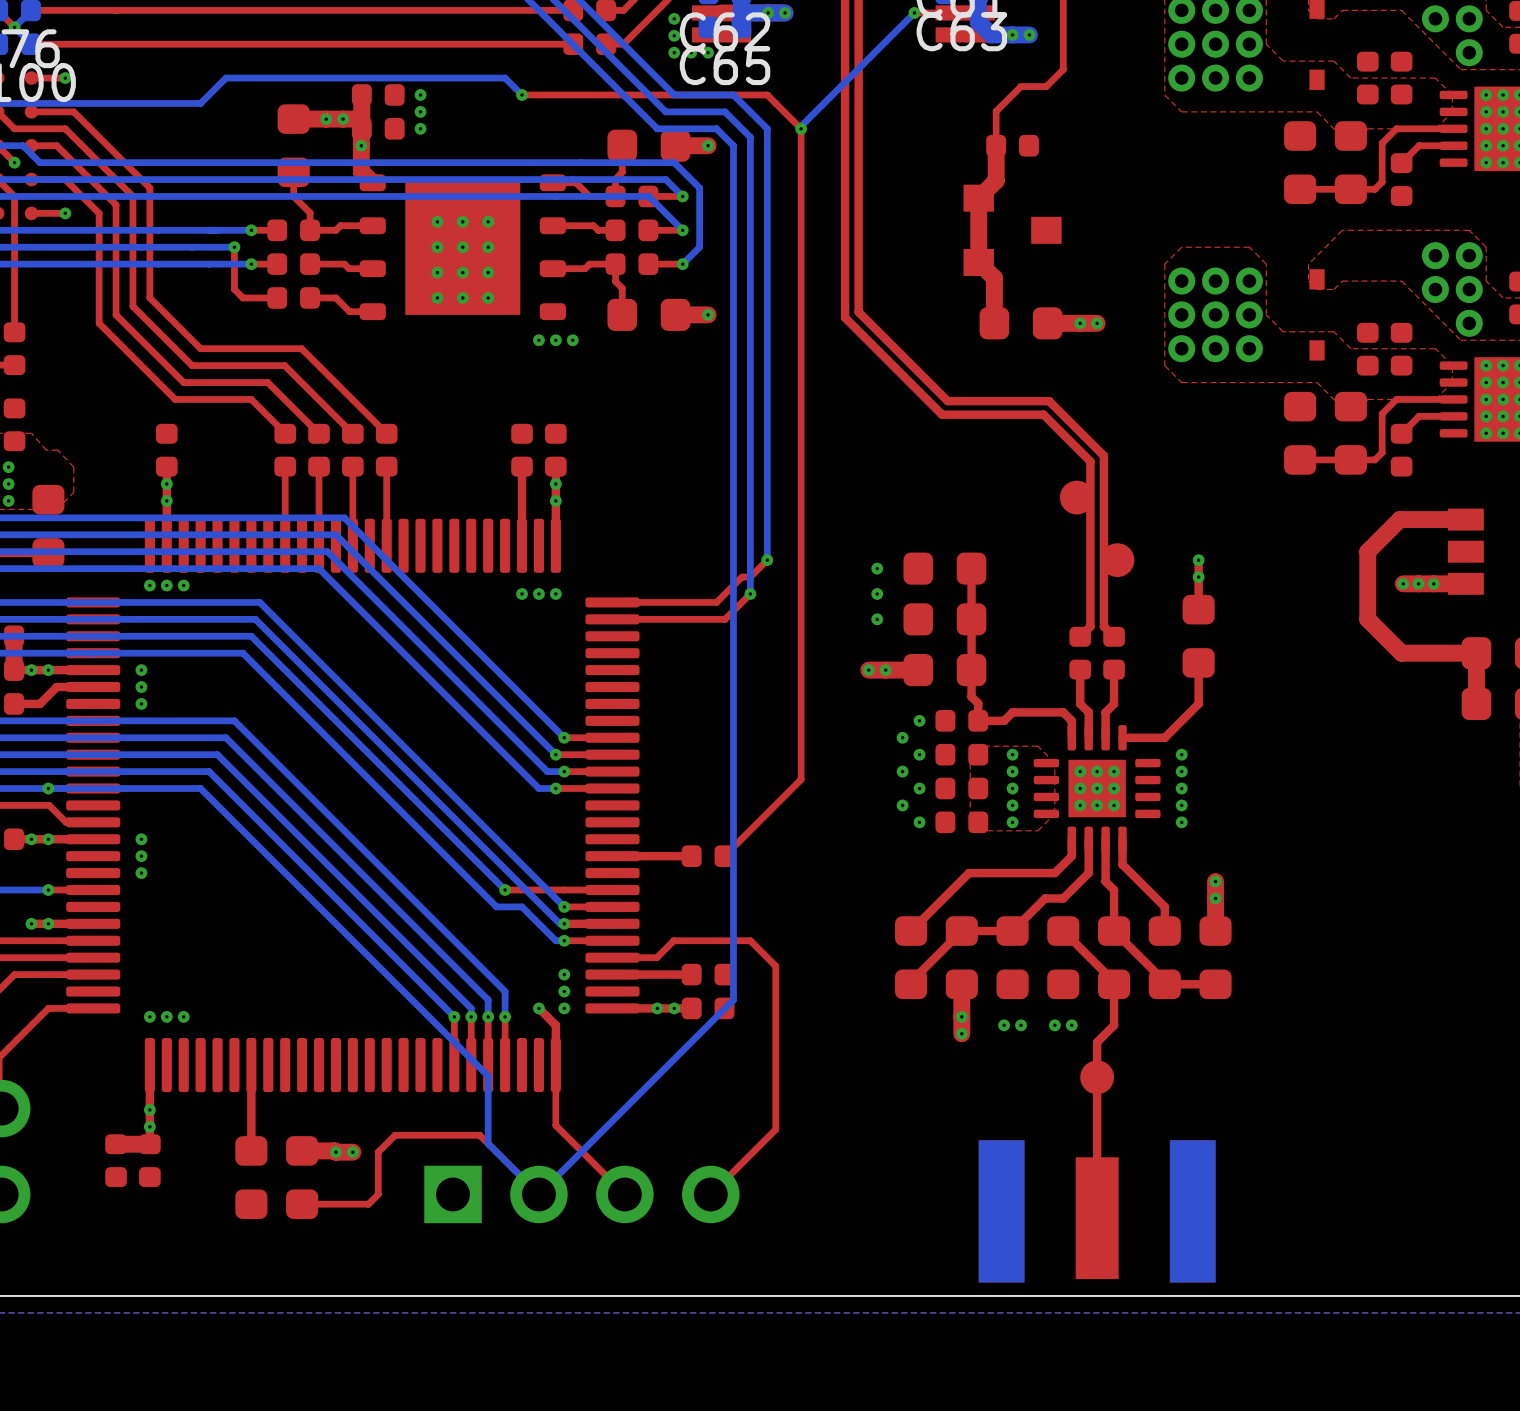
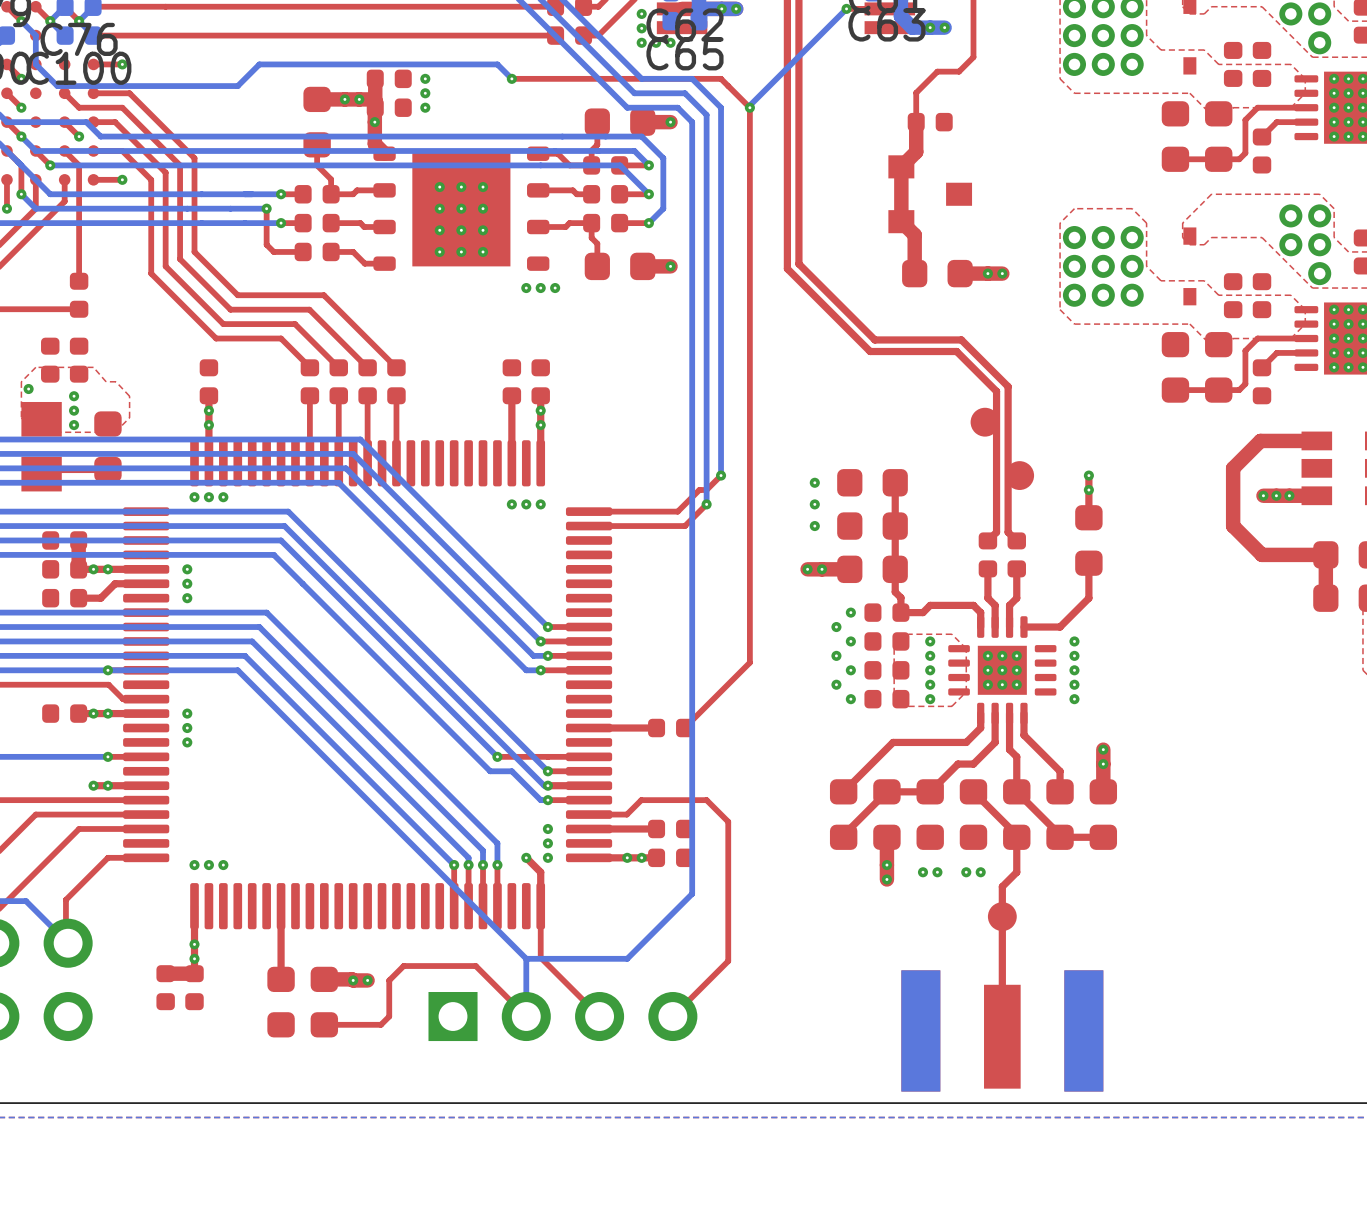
bottom track: (733, 999) (538, 1194) (488, 1143) (488, 1076) -> (692, 850) (692, 893) (627, 958) (526, 958)
bottom track: none -> (483, 915) (526, 958)
bottom track: none -> (526, 958) (526, 1016)

